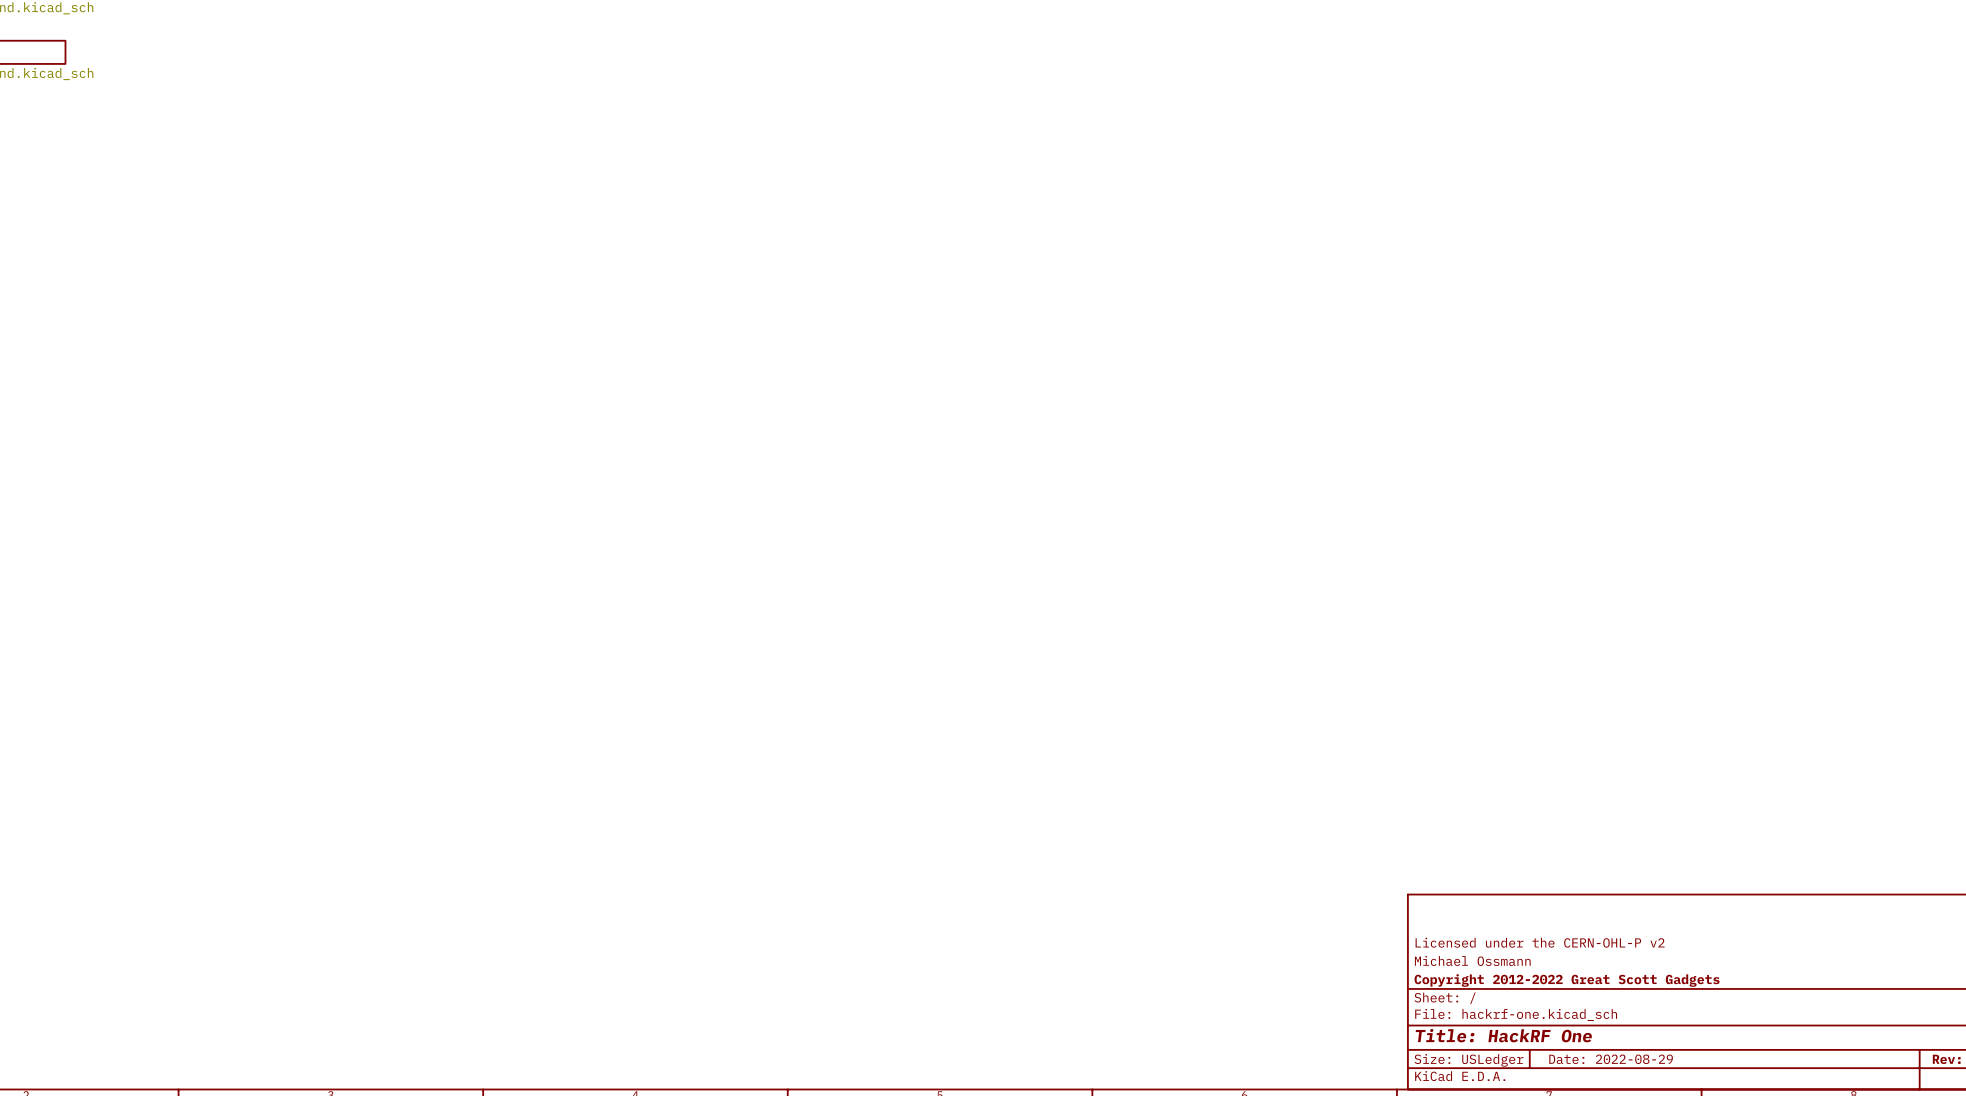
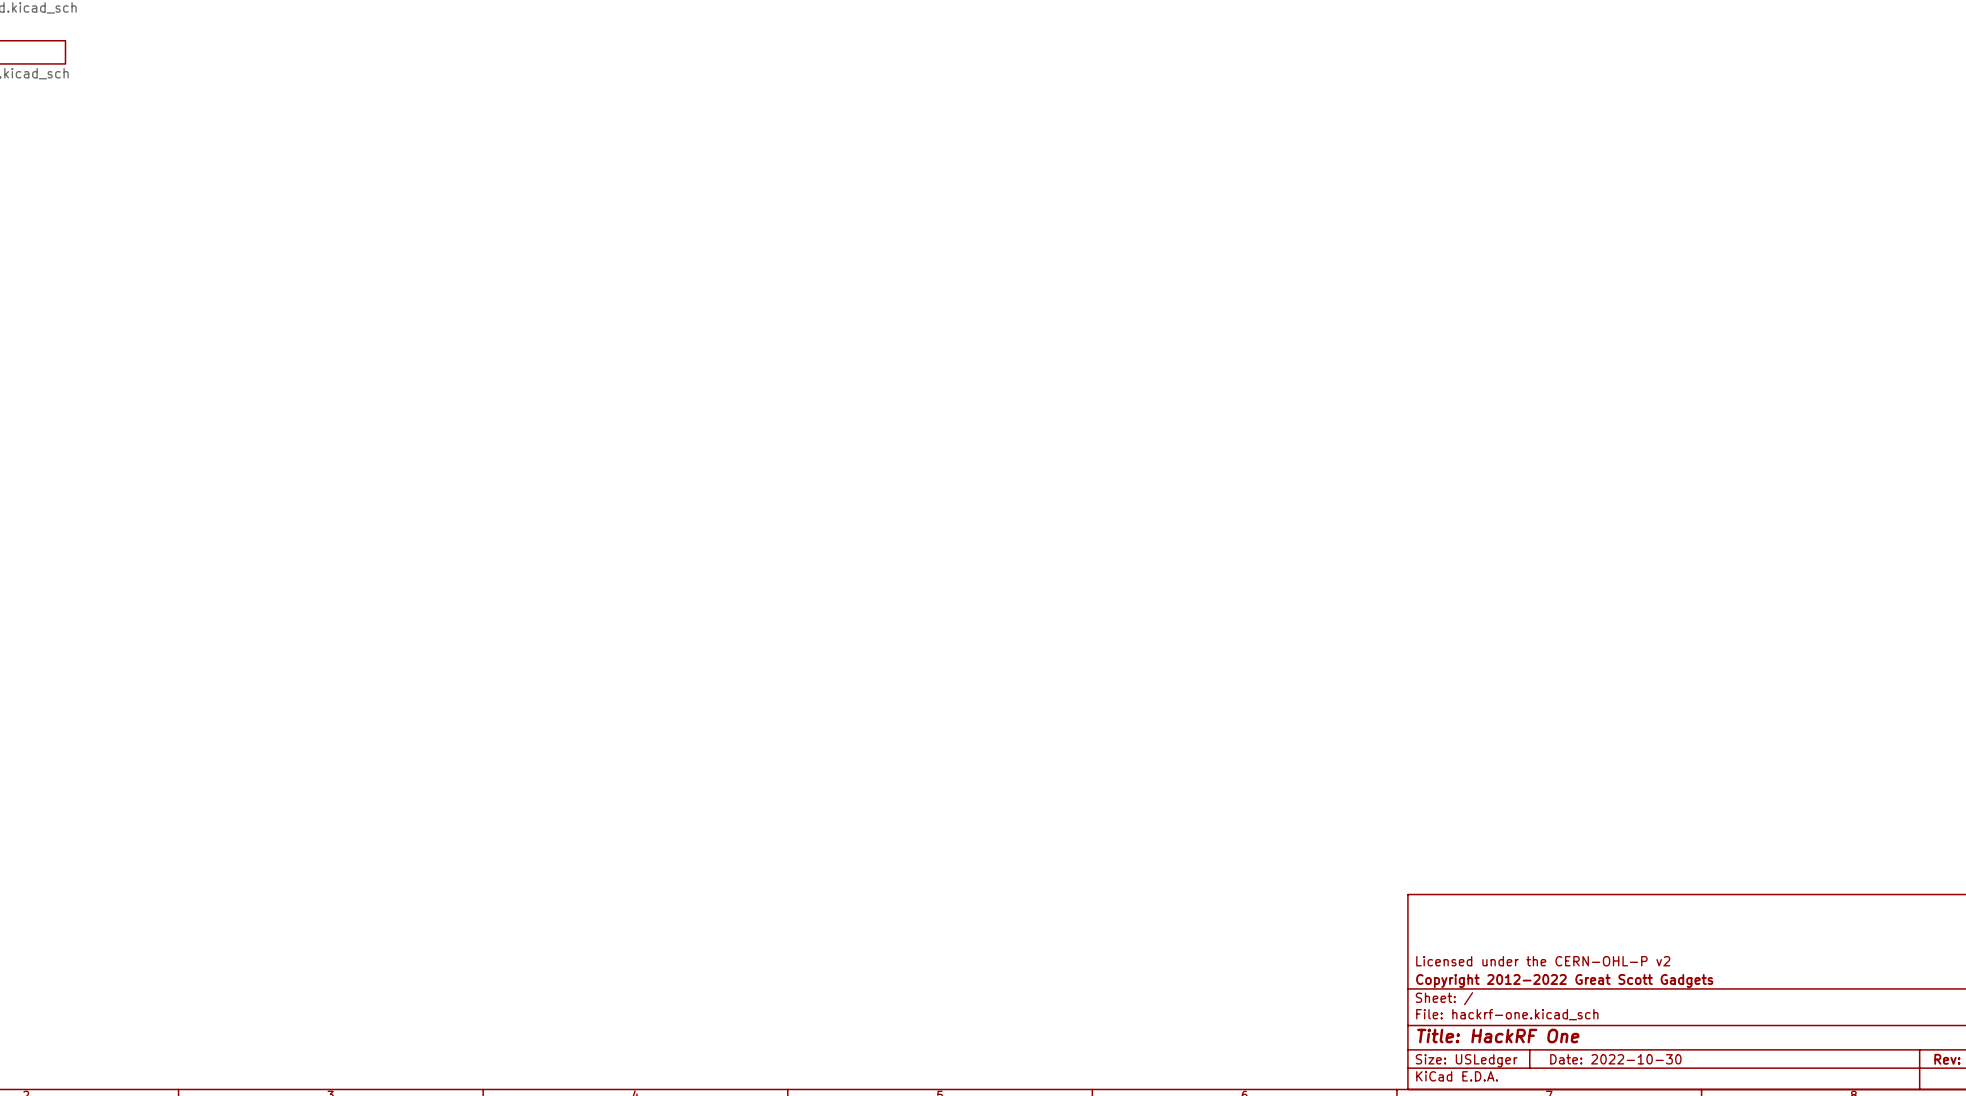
title block: Licensed under the CERN-OHL-P v2 (1540, 942) -> none
title block: Michael Ossmann (1472, 960) -> Licensed under the CERN-OHL-P v2 (1543, 961)
title block: Date: 2022-08-29 (1611, 1059) -> Date: 2022-10-30 (1615, 1059)

